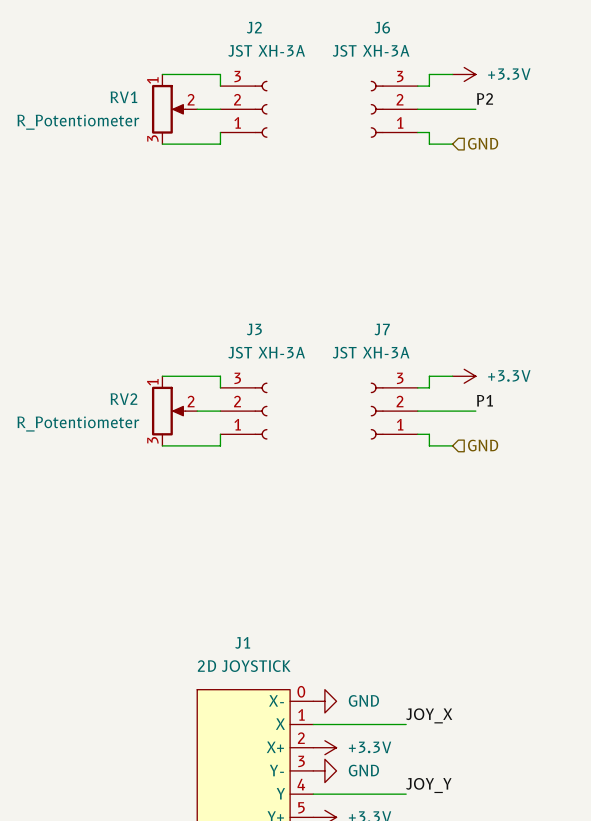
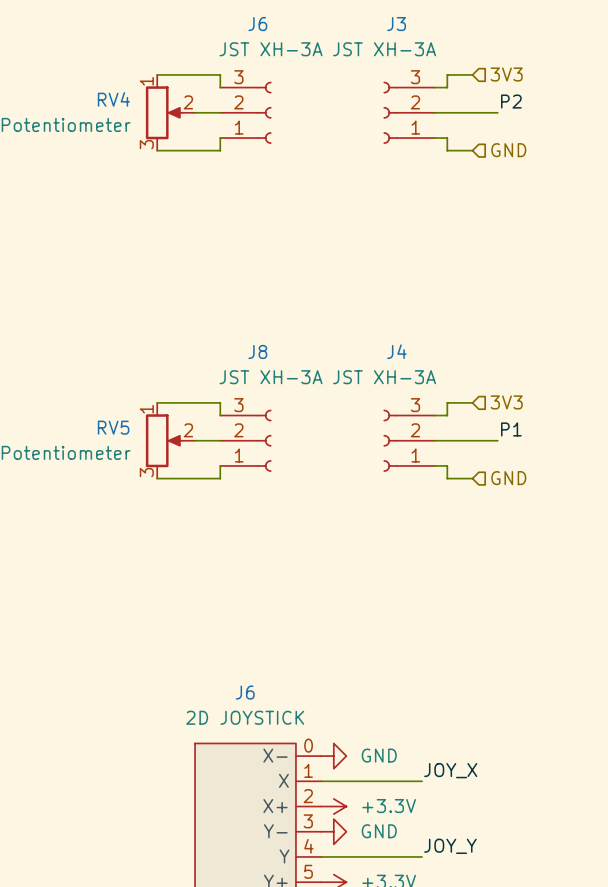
J2 name: J2 (254, 27) -> J6 (257, 24)
J6 name: J6 (382, 27) -> J3 (396, 24)
power symbol: +3.3V (464, 74) -> none
hierarchical label: none -> 3V3 (506, 74)
RV1 name: RV1 (123, 97) -> RV4 (113, 99)
J3 name: J3 (254, 329) -> J8 (257, 351)
J7 name: J7 (382, 329) -> J4 (396, 351)
hierarchical label: none -> 3V3 (506, 402)
power symbol: +3.3V (464, 376) -> none
RV2 name: RV2 (123, 399) -> RV5 (113, 427)
J1 name: J1 (242, 642) -> J6 (245, 692)

